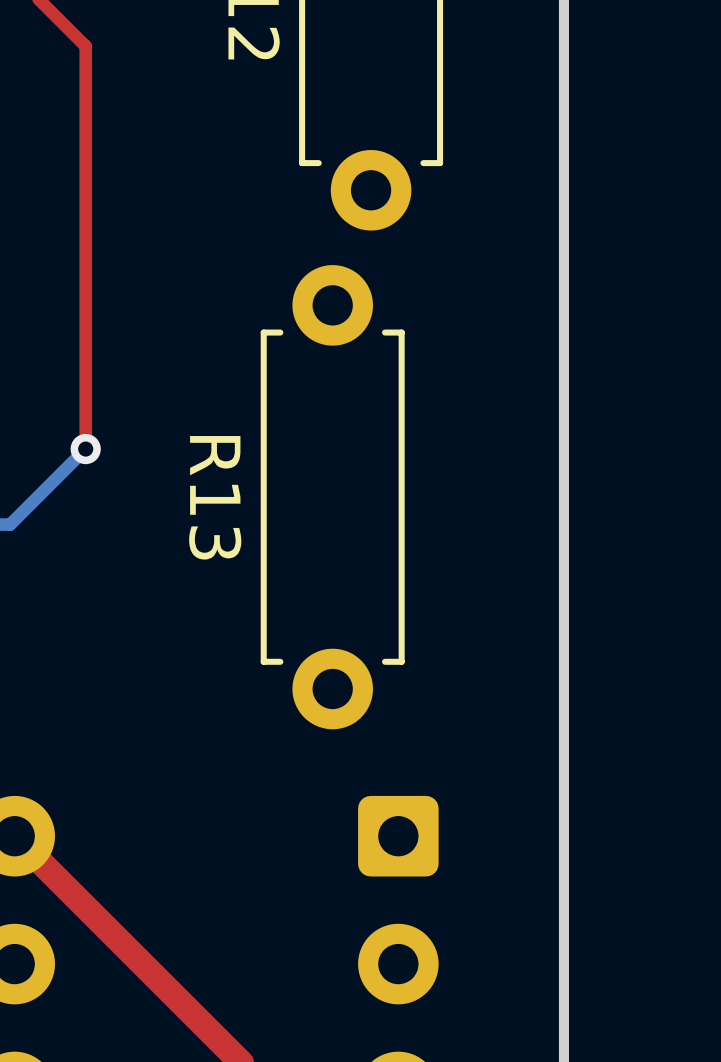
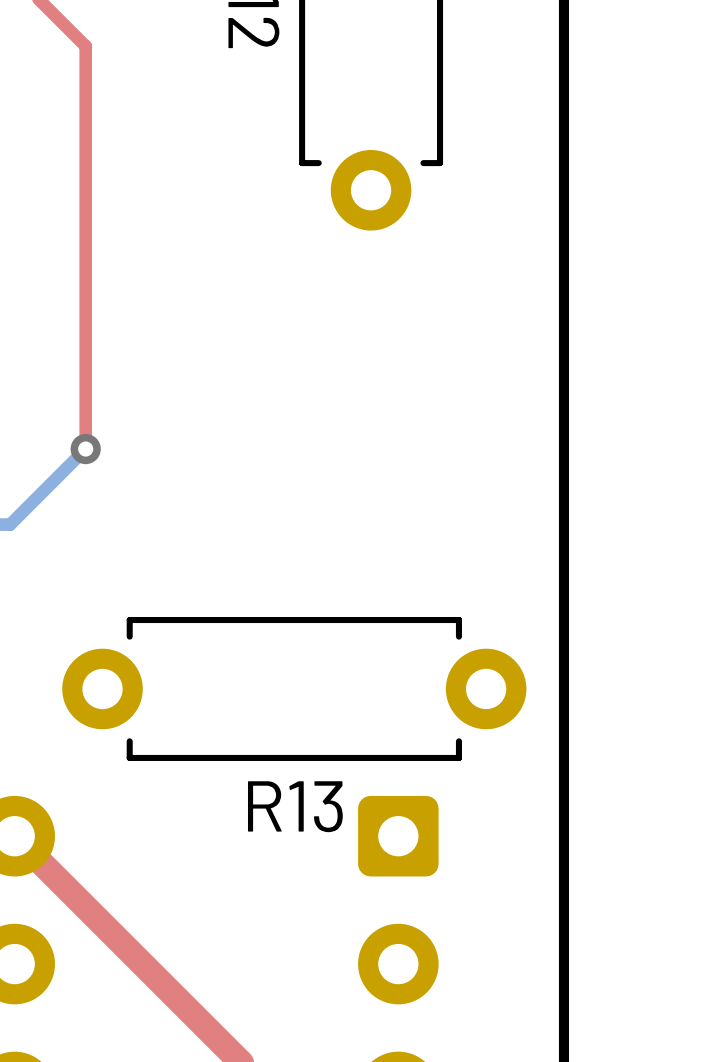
R13 name position: R13 (215, 497) -> R13 (295, 806)
R13 rotation: 0° (332, 497) -> 90° clockwise (294, 688)

